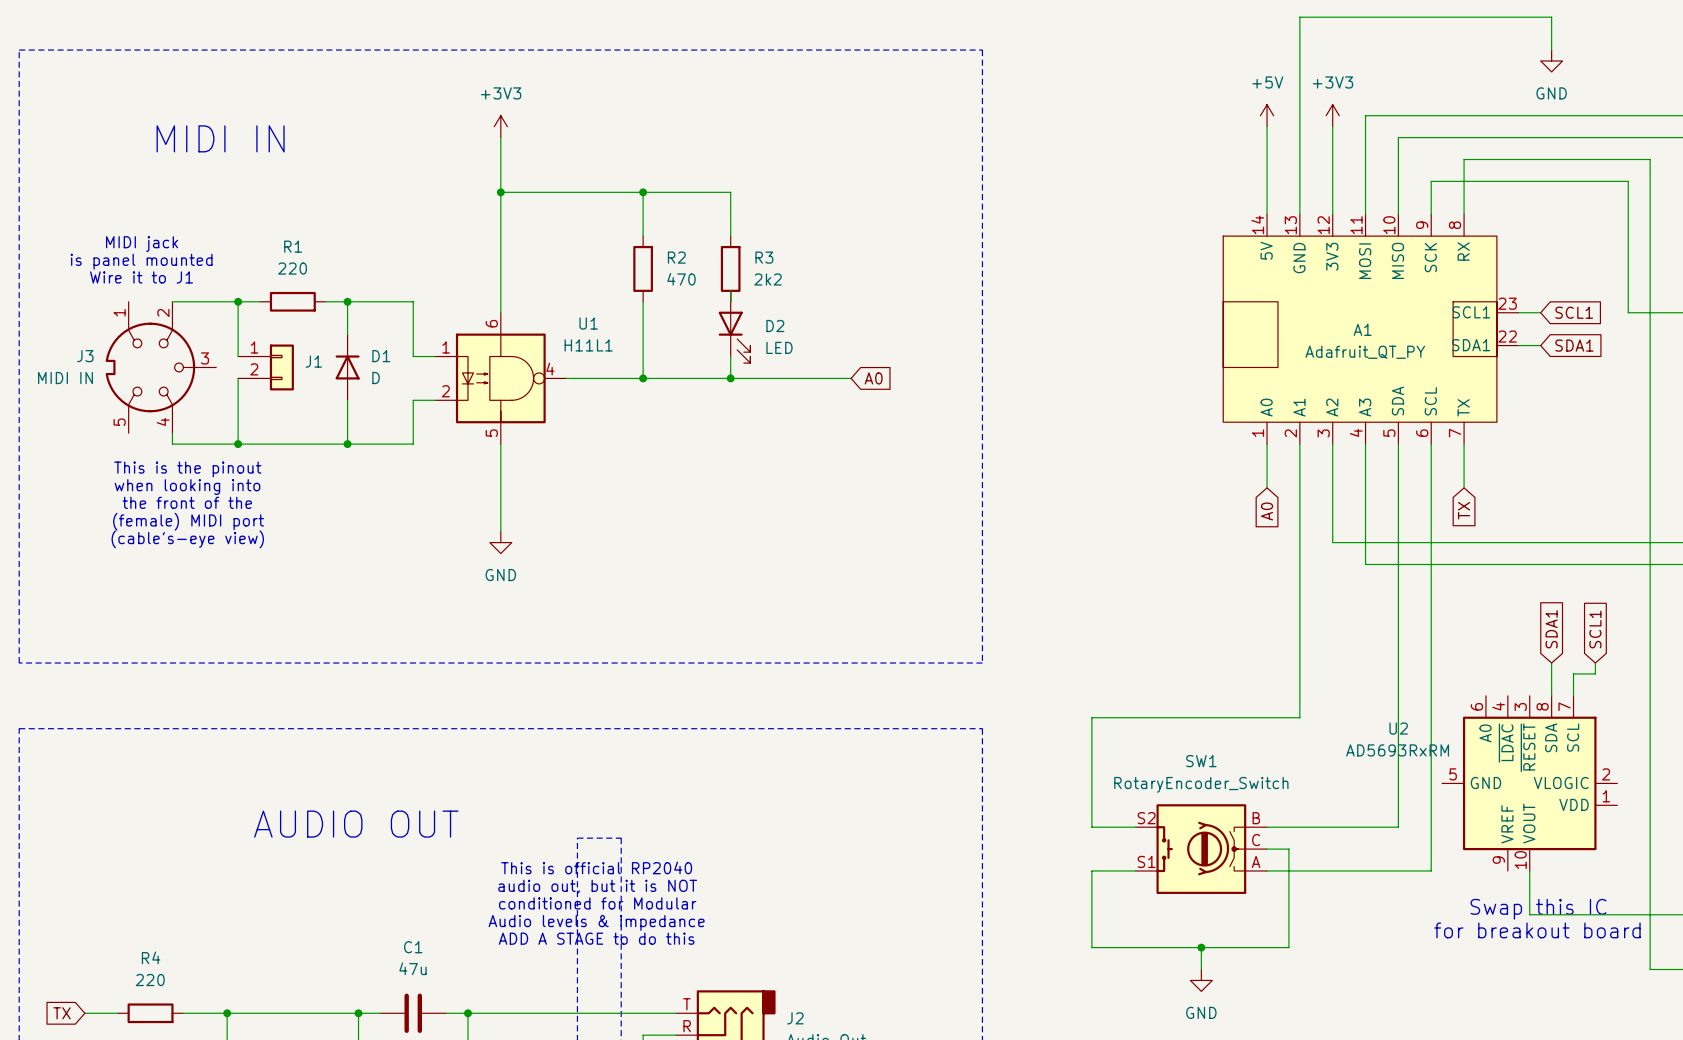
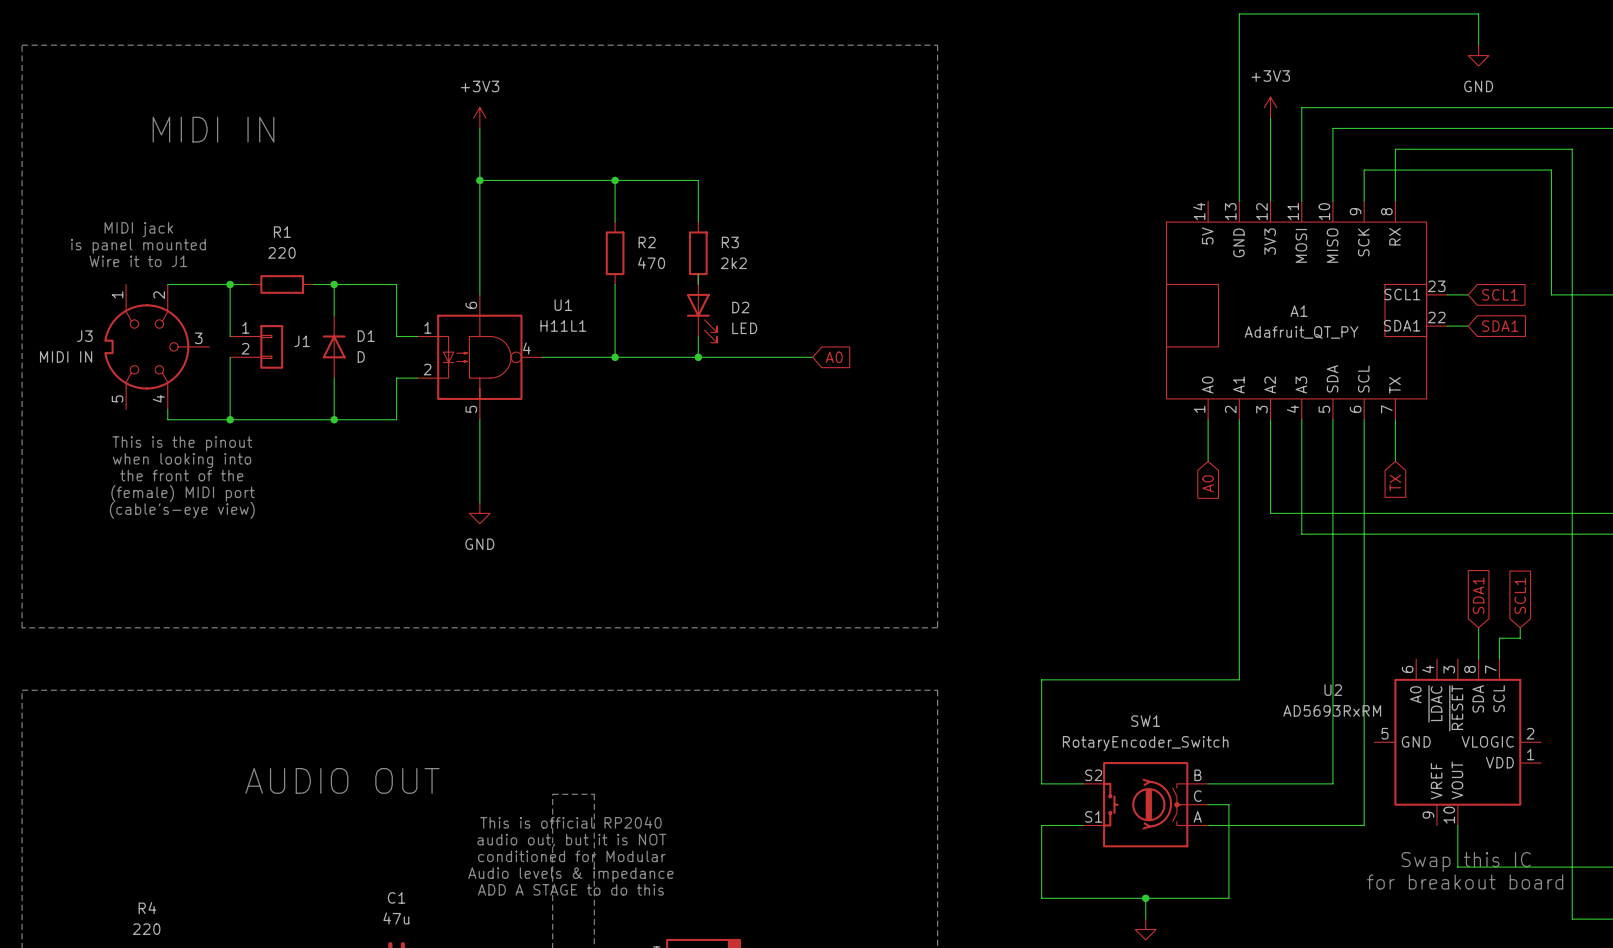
power symbol: +5V (1267, 115) -> none
wire: (1267, 126) (1267, 214) -> none

